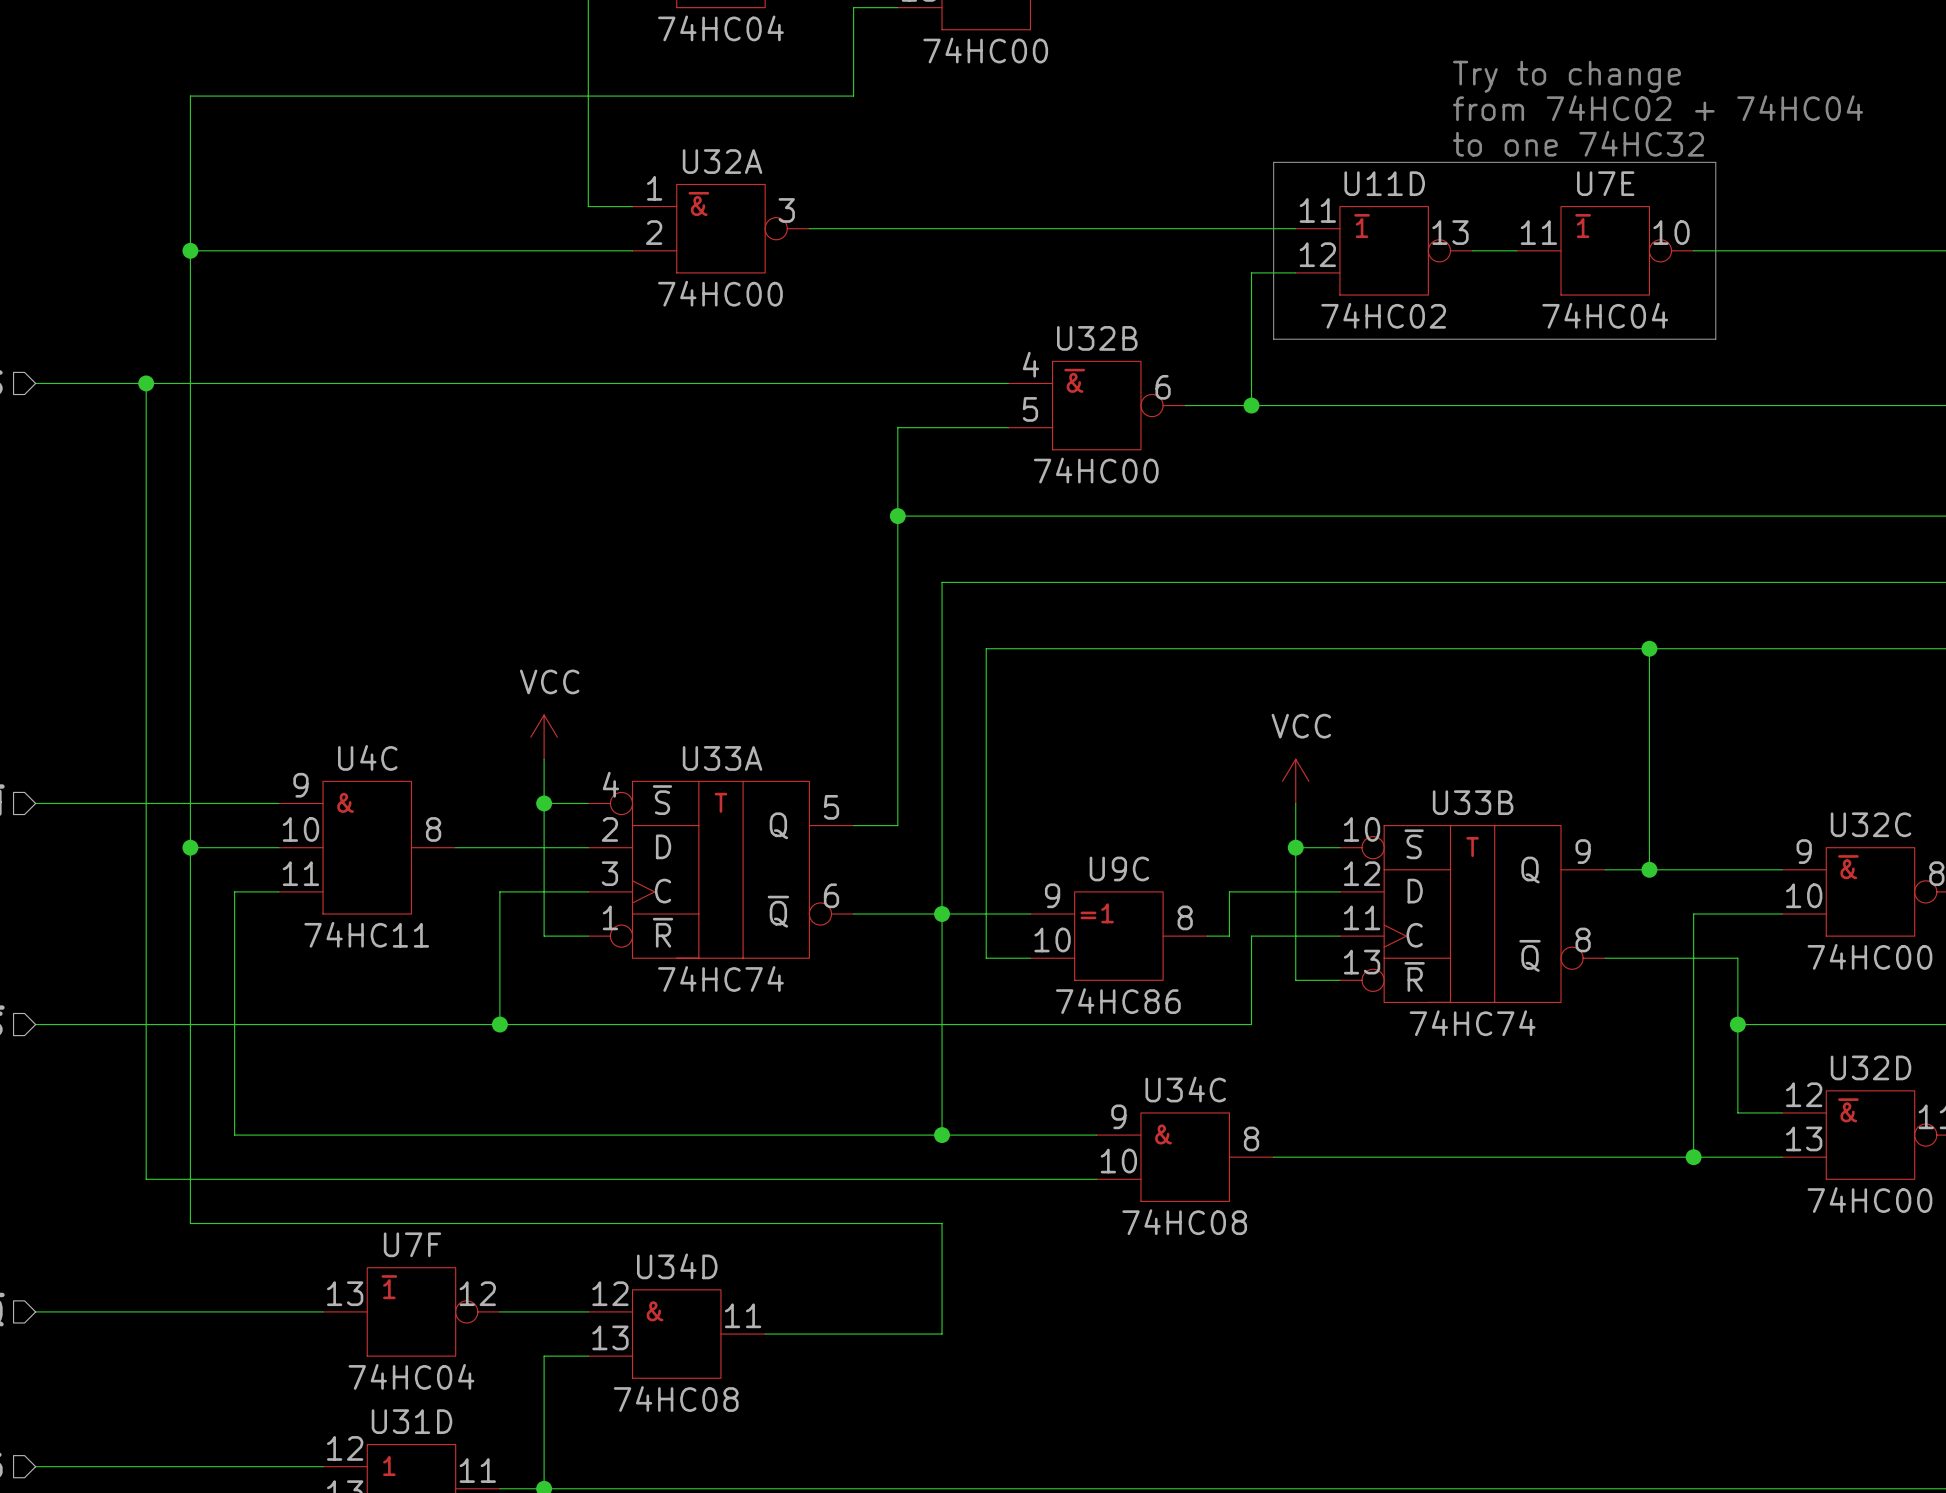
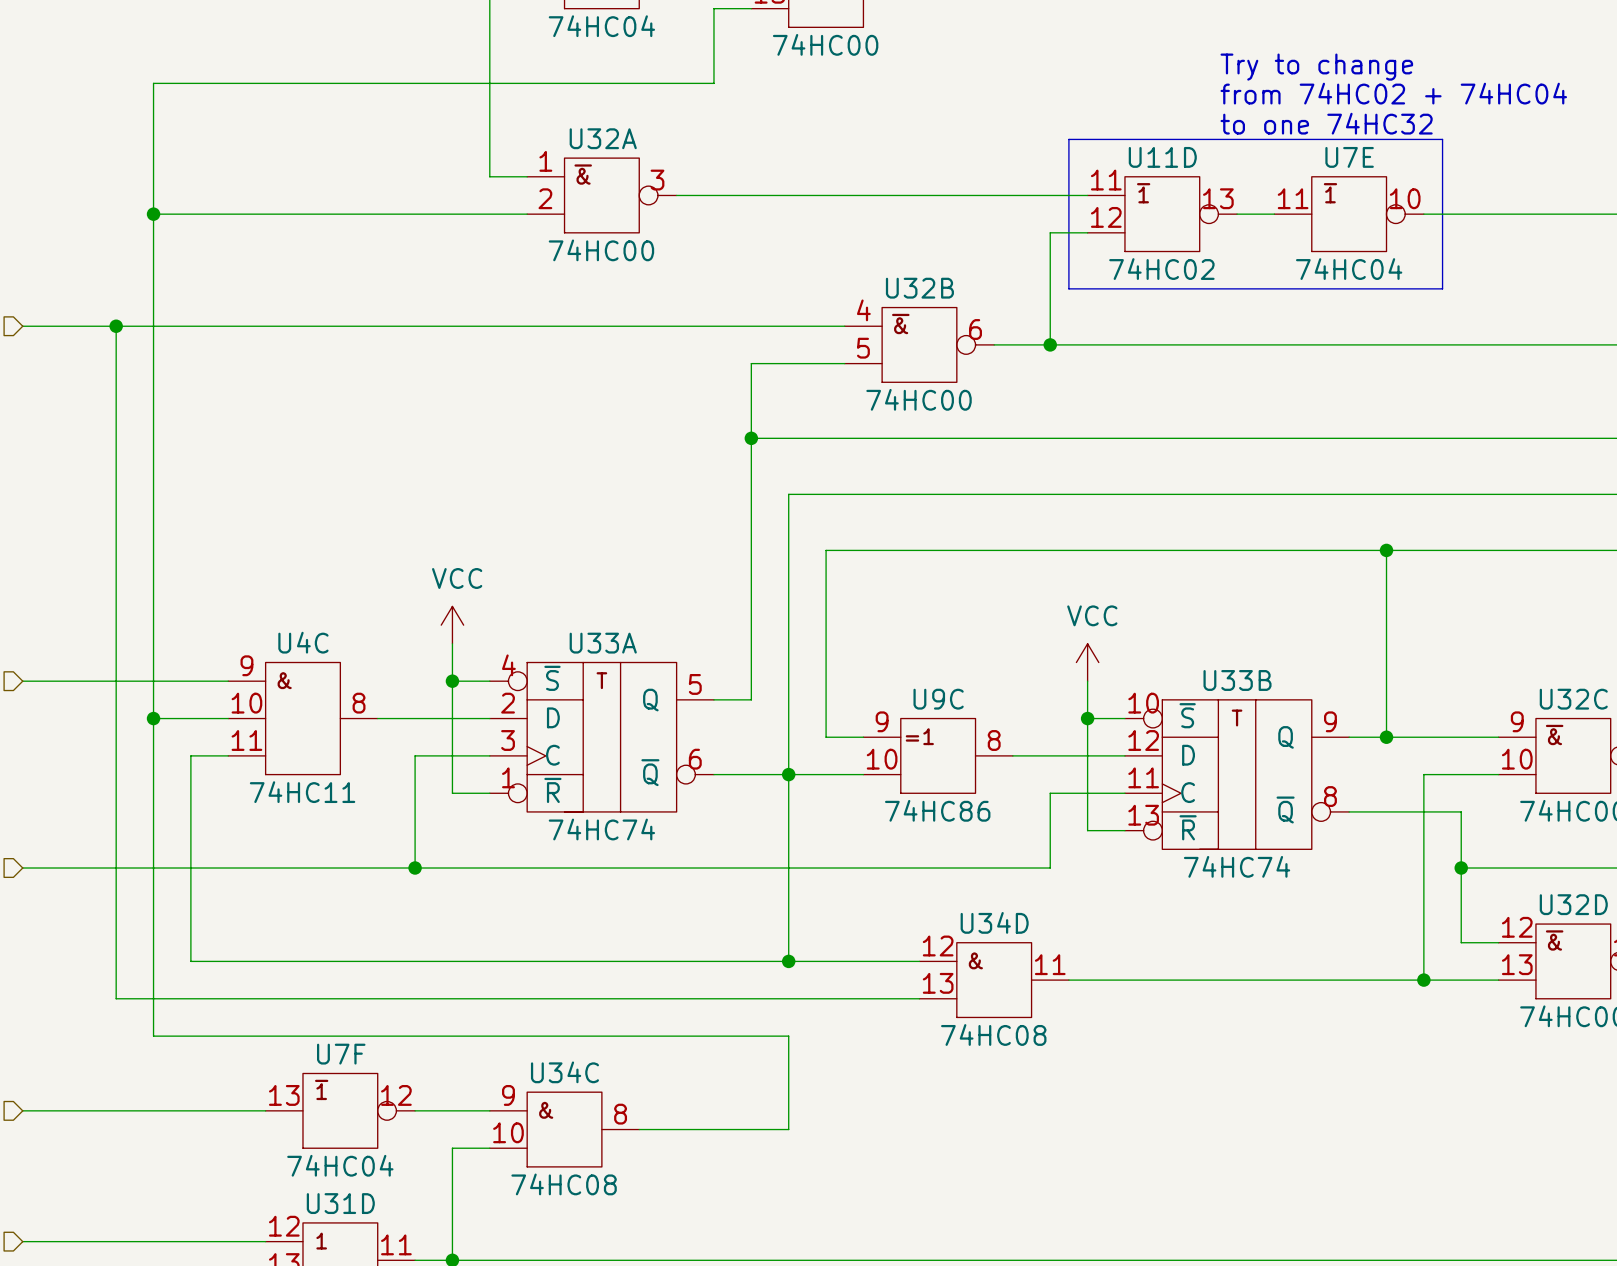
wire: (986, 869) (986, 958) (1030, 958) -> (826, 737) (863, 737)
wire: (1229, 891) (1229, 936) (1207, 936) -> (1031, 755) (1012, 755)
U9C position: (1118, 936) -> (938, 755)
U34C position: (1185, 1157) -> (564, 1129)
U34D position: (676, 1334) -> (994, 980)

